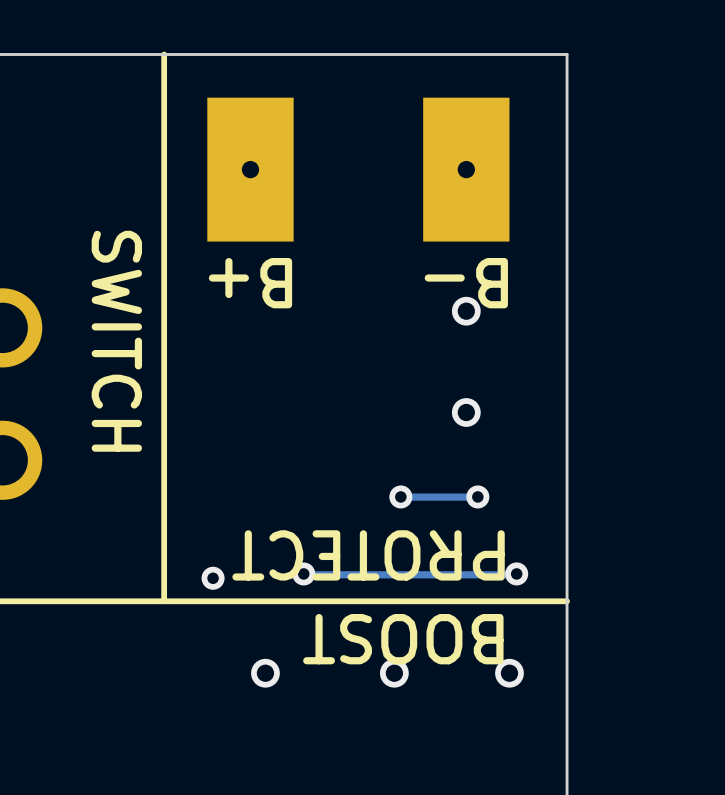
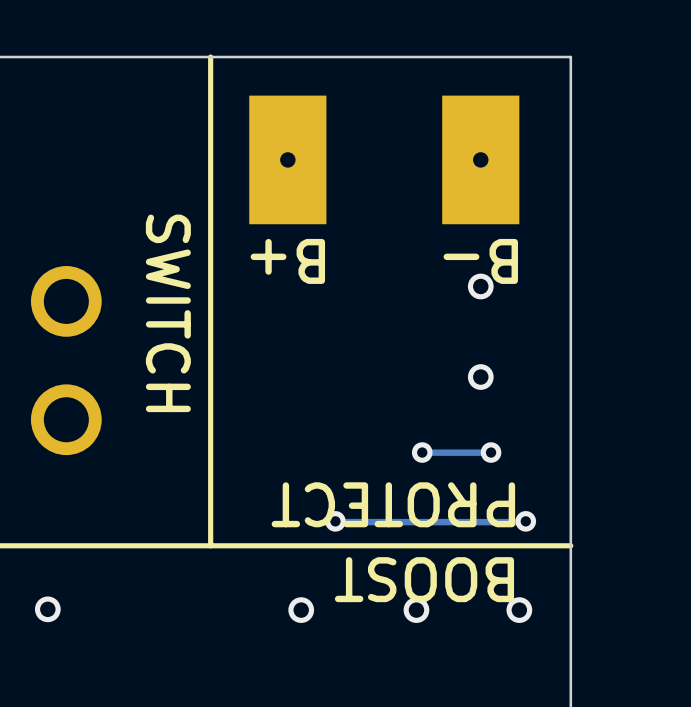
via: (213, 578) -> none

